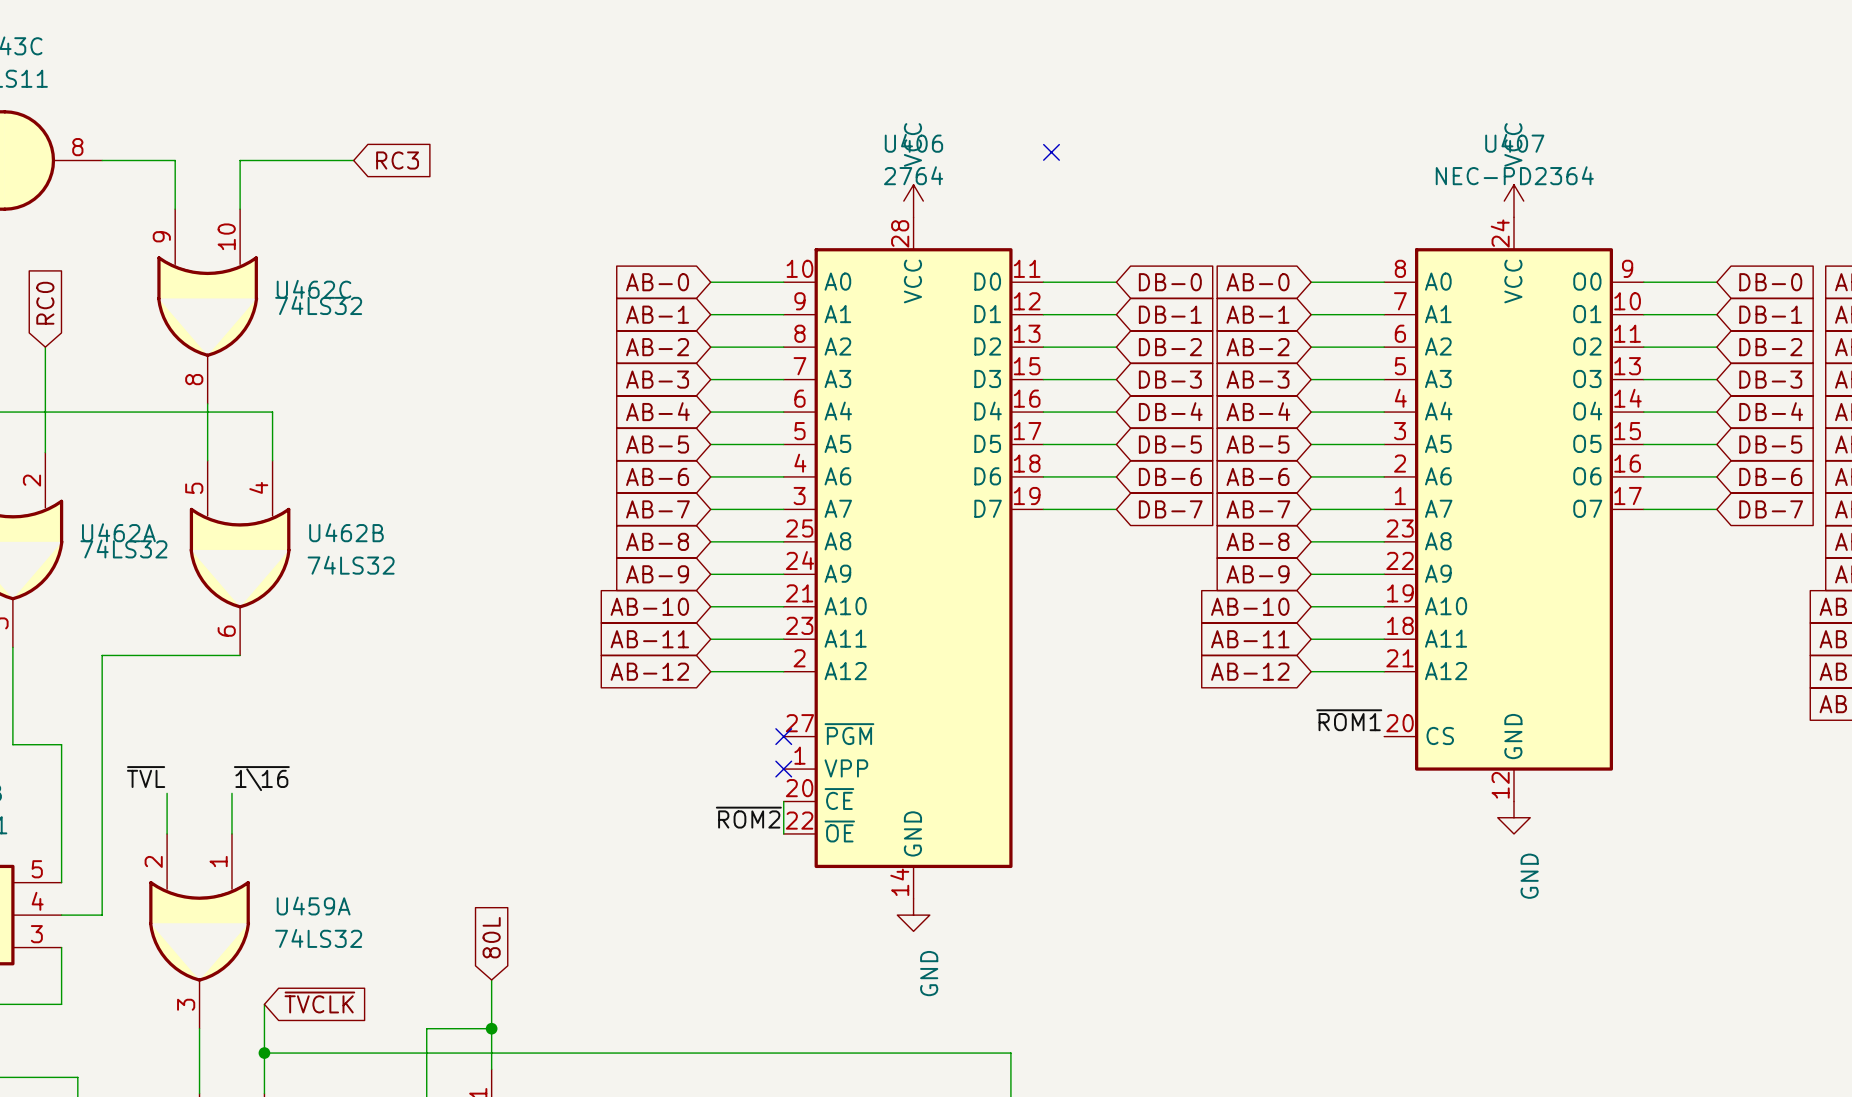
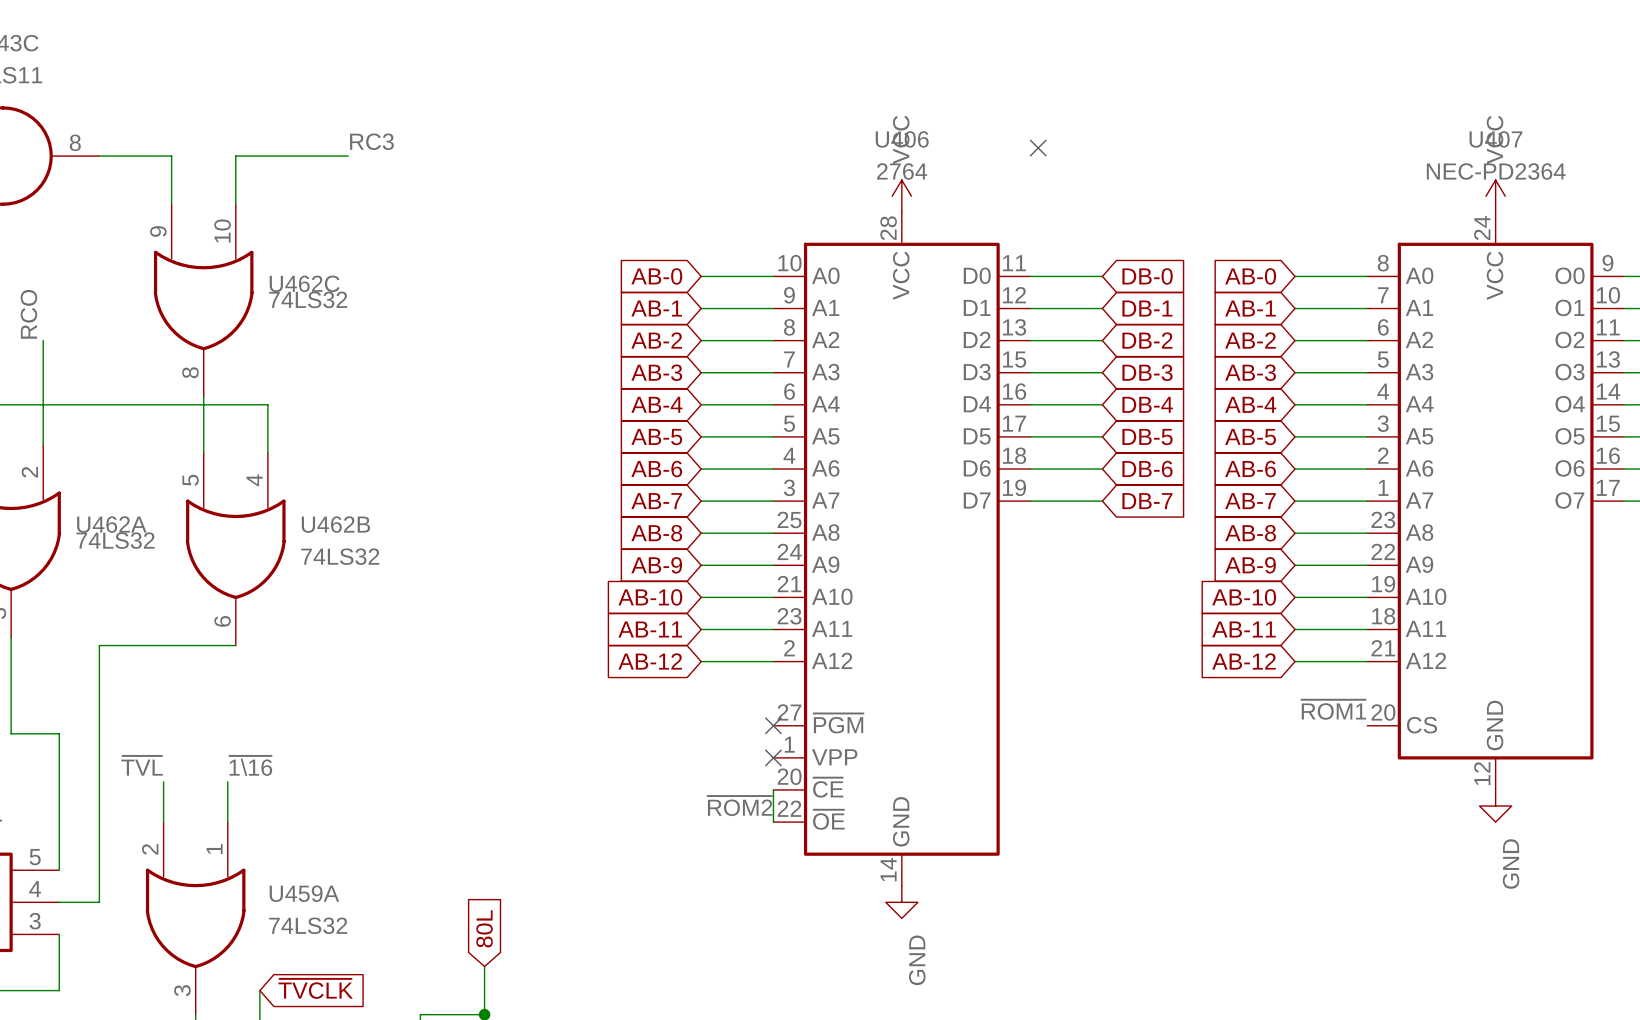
label: none -> RC3 (371, 141)
global label: RC3 (397, 160) -> none
global label: RC0 (45, 303) -> none
label: none -> RCO (28, 314)

